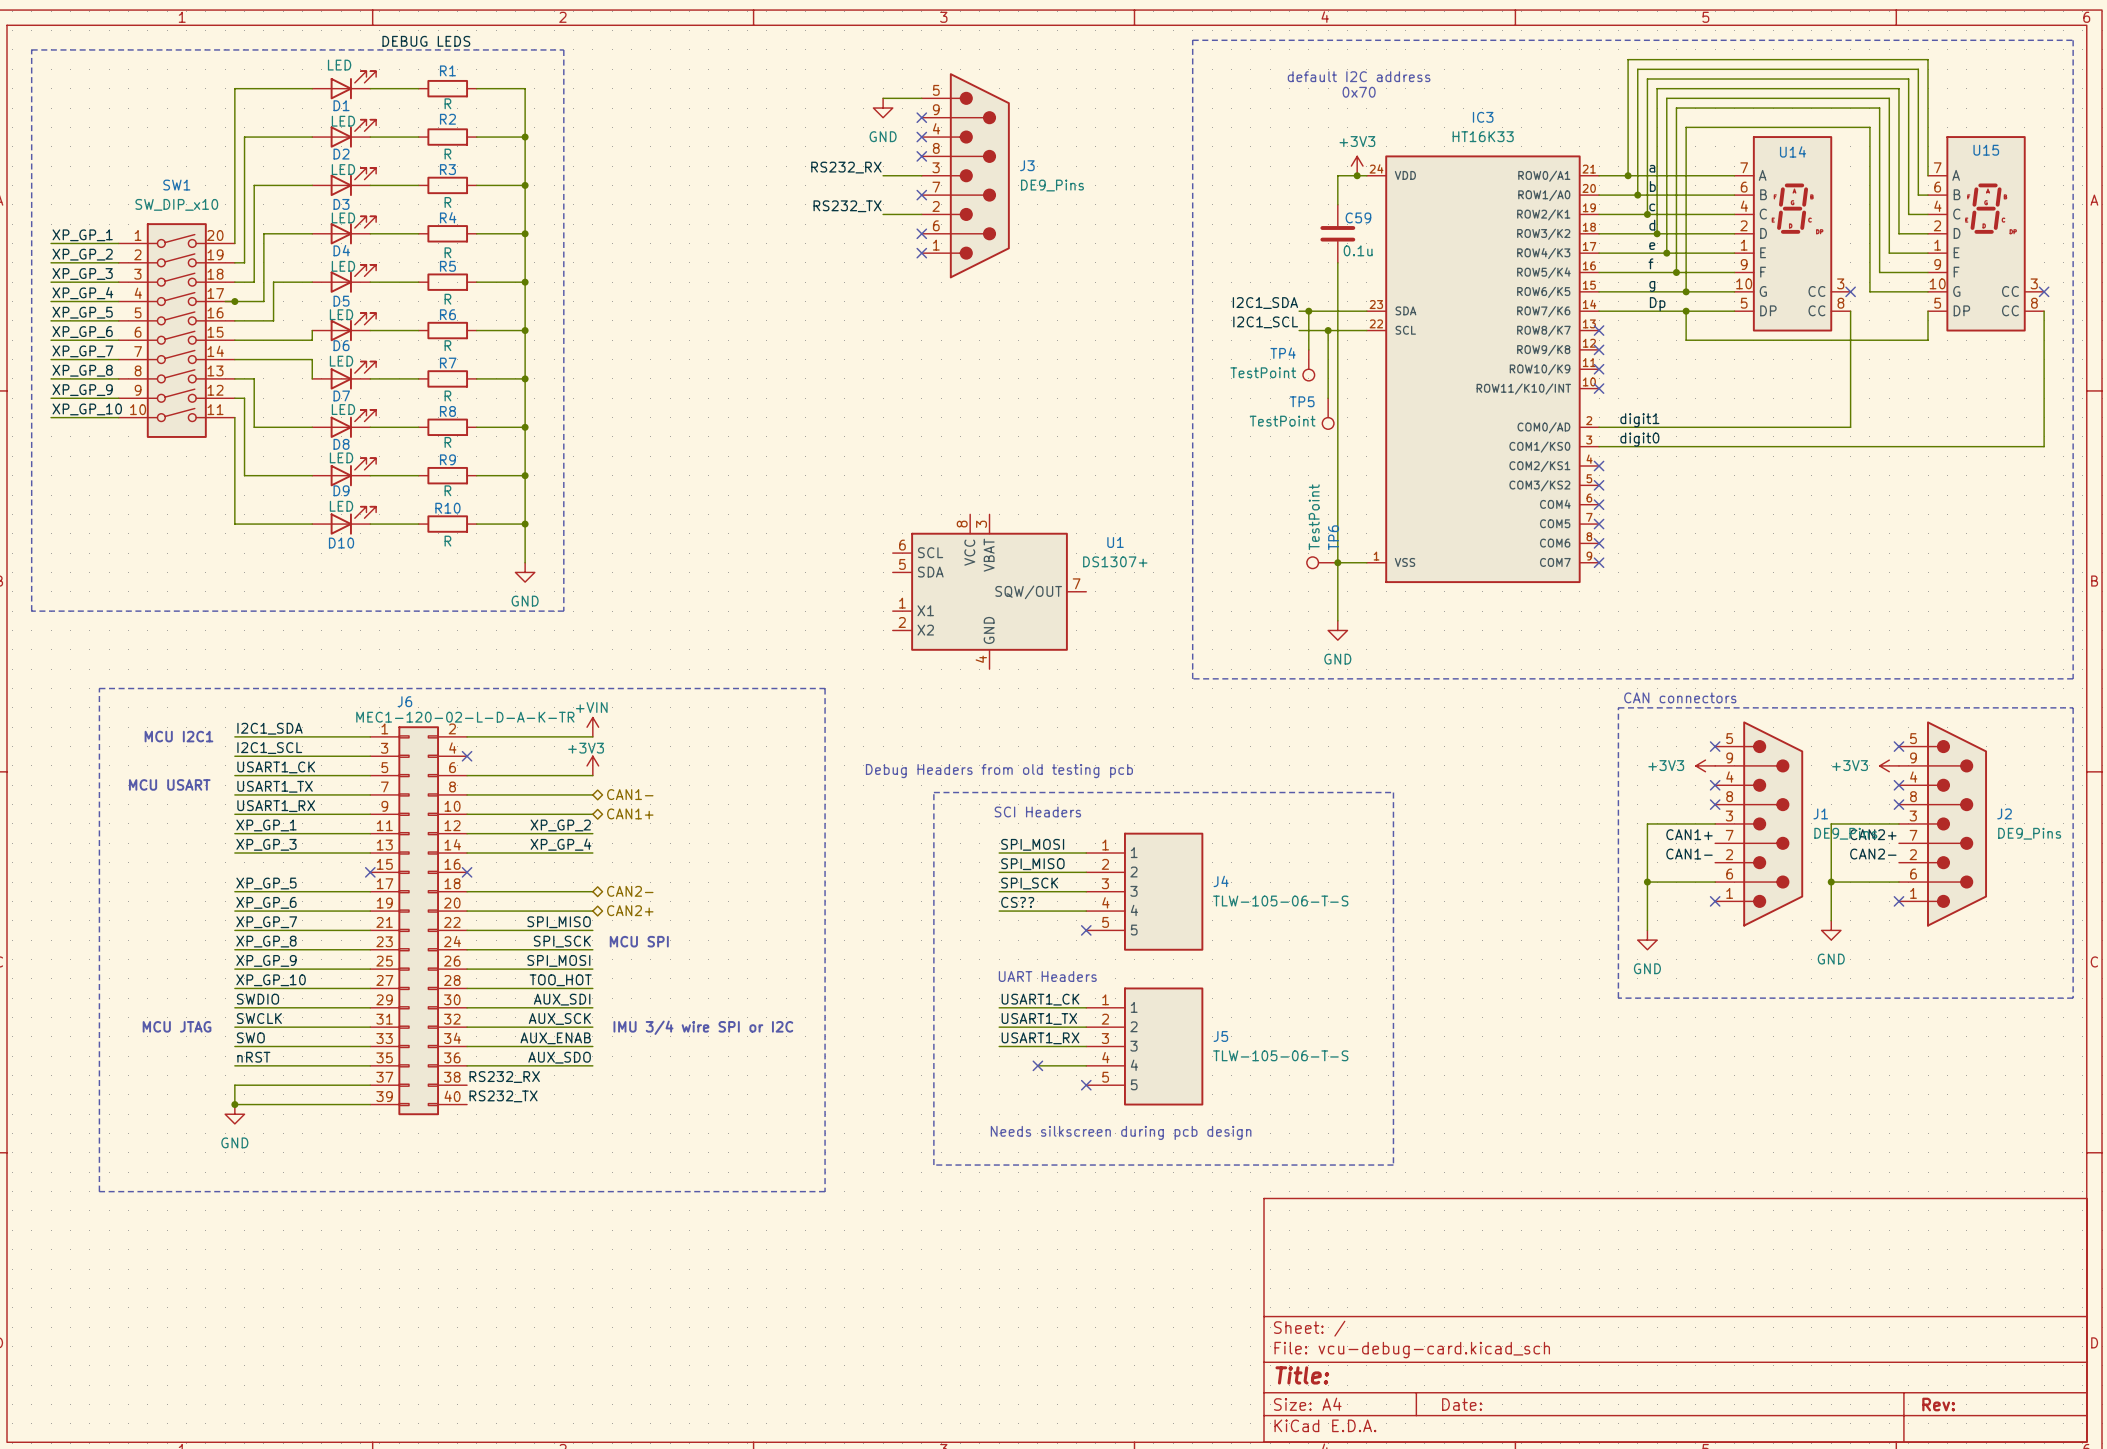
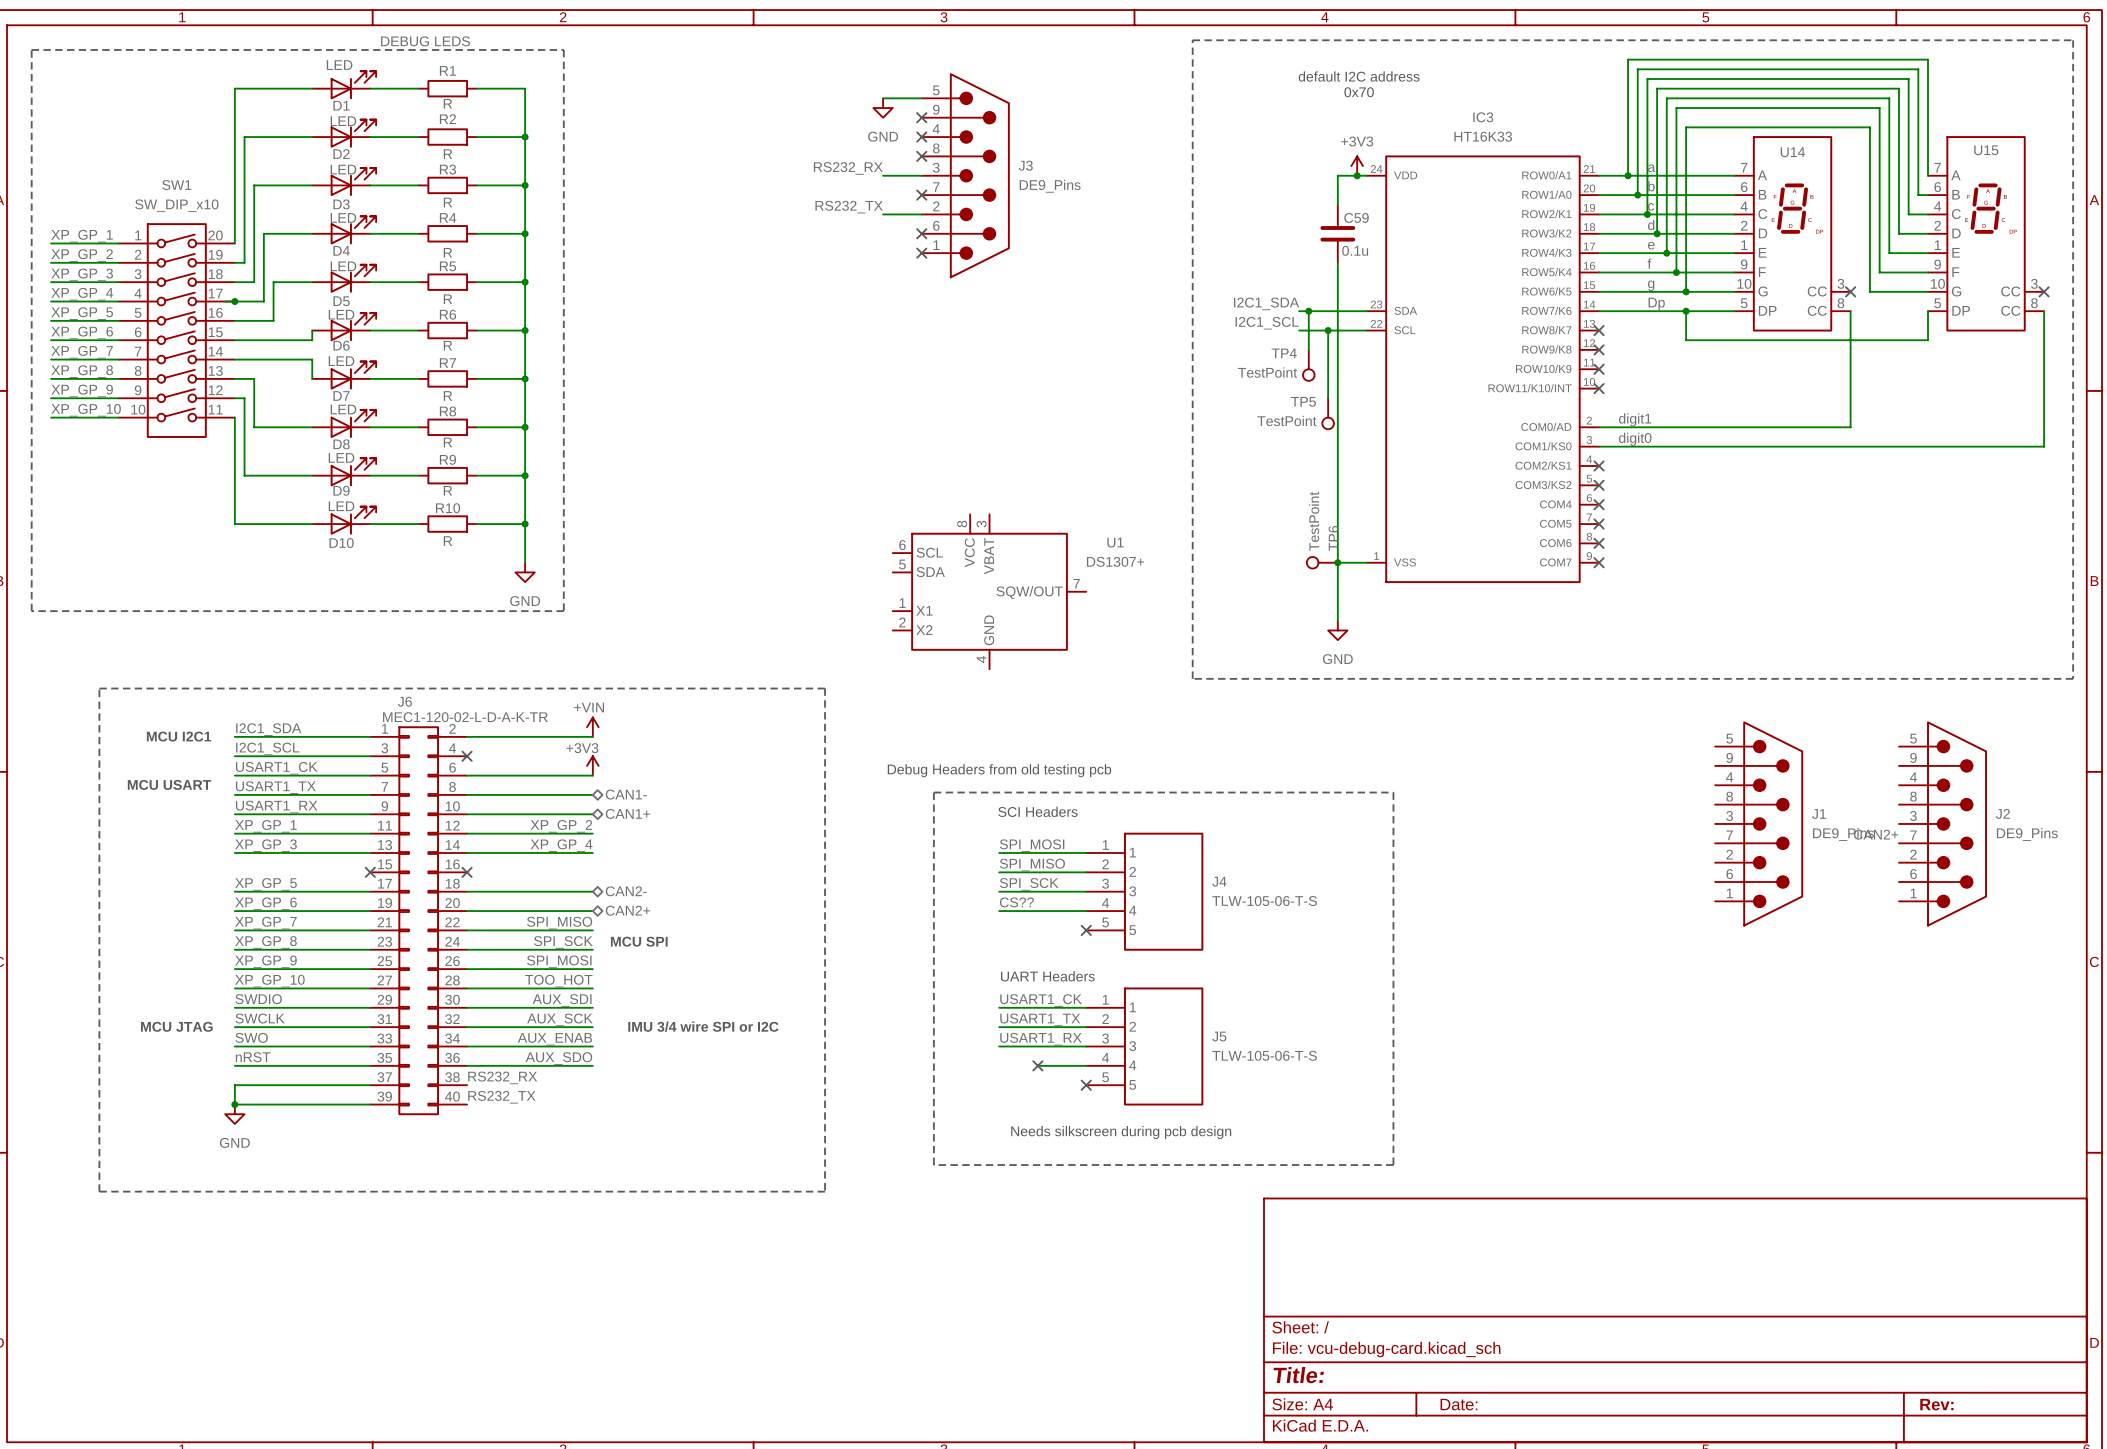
text: CAN connectors (1680, 697) -> none
line: (1618, 707) (2073, 707) (2073, 998) (1618, 998) (1618, 707) -> none
no-connect mark: (1715, 746) -> none
no-connect mark: (1898, 746) -> none
power symbol: +3V3 (1705, 765) -> none
power symbol: +3V3 (1889, 765) -> none
no-connect mark: (1715, 785) -> none
no-connect mark: (1898, 785) -> none
no-connect mark: (1715, 804) -> none
no-connect mark: (1898, 804) -> none
wire: (1715, 823) (1647, 823) (1647, 930) -> none
wire: (1898, 823) (1831, 823) (1831, 920) -> none
label: CAN1+ (1689, 834) -> none
label: CAN1- (1689, 854) -> none
label: CAN2- (1873, 854) -> none
wire: (1647, 882) (1715, 882) -> none
junction: (1647, 882) -> none
wire: (1831, 882) (1898, 882) -> none
junction: (1831, 882) -> none
no-connect mark: (1715, 901) -> none
no-connect mark: (1898, 901) -> none
power symbol: GND (1831, 930) -> none
power symbol: GND (1647, 940) -> none

